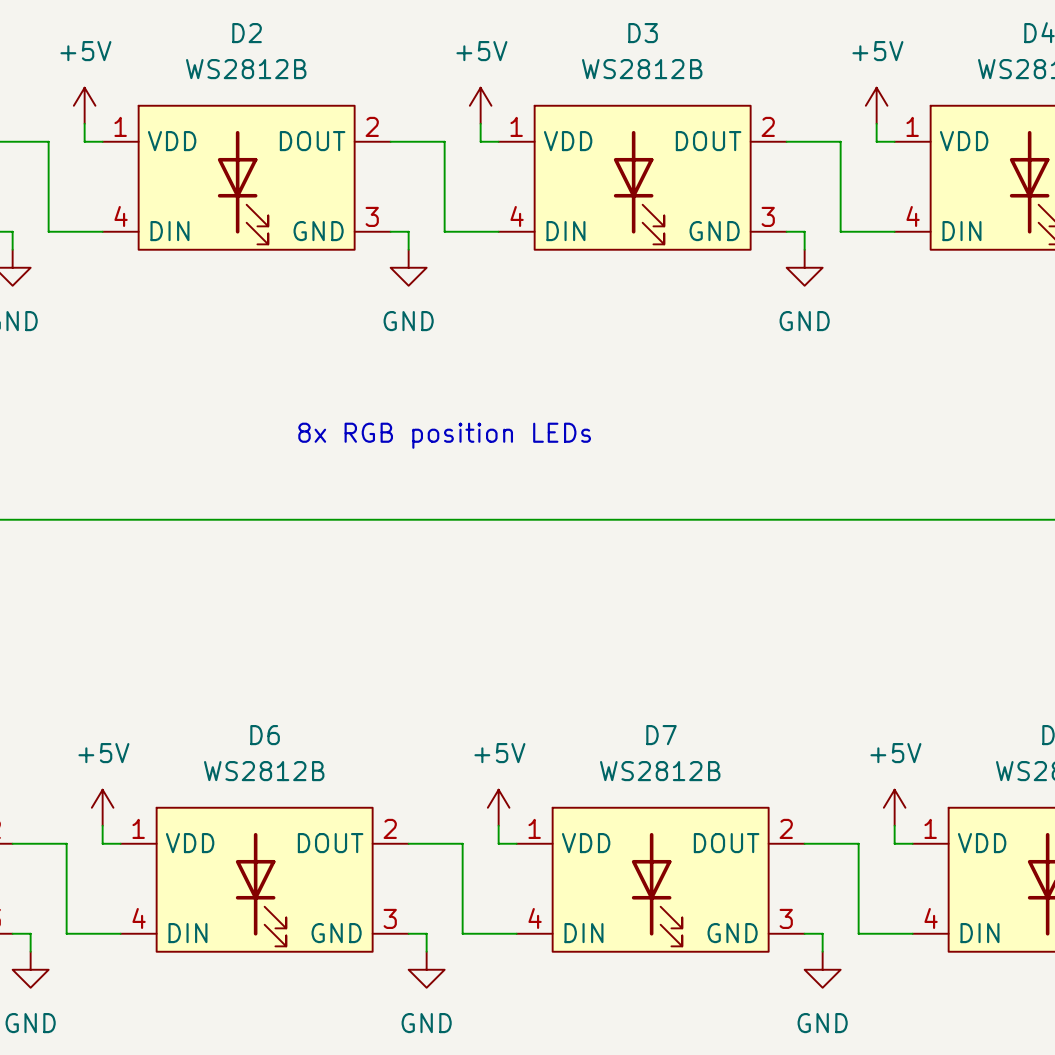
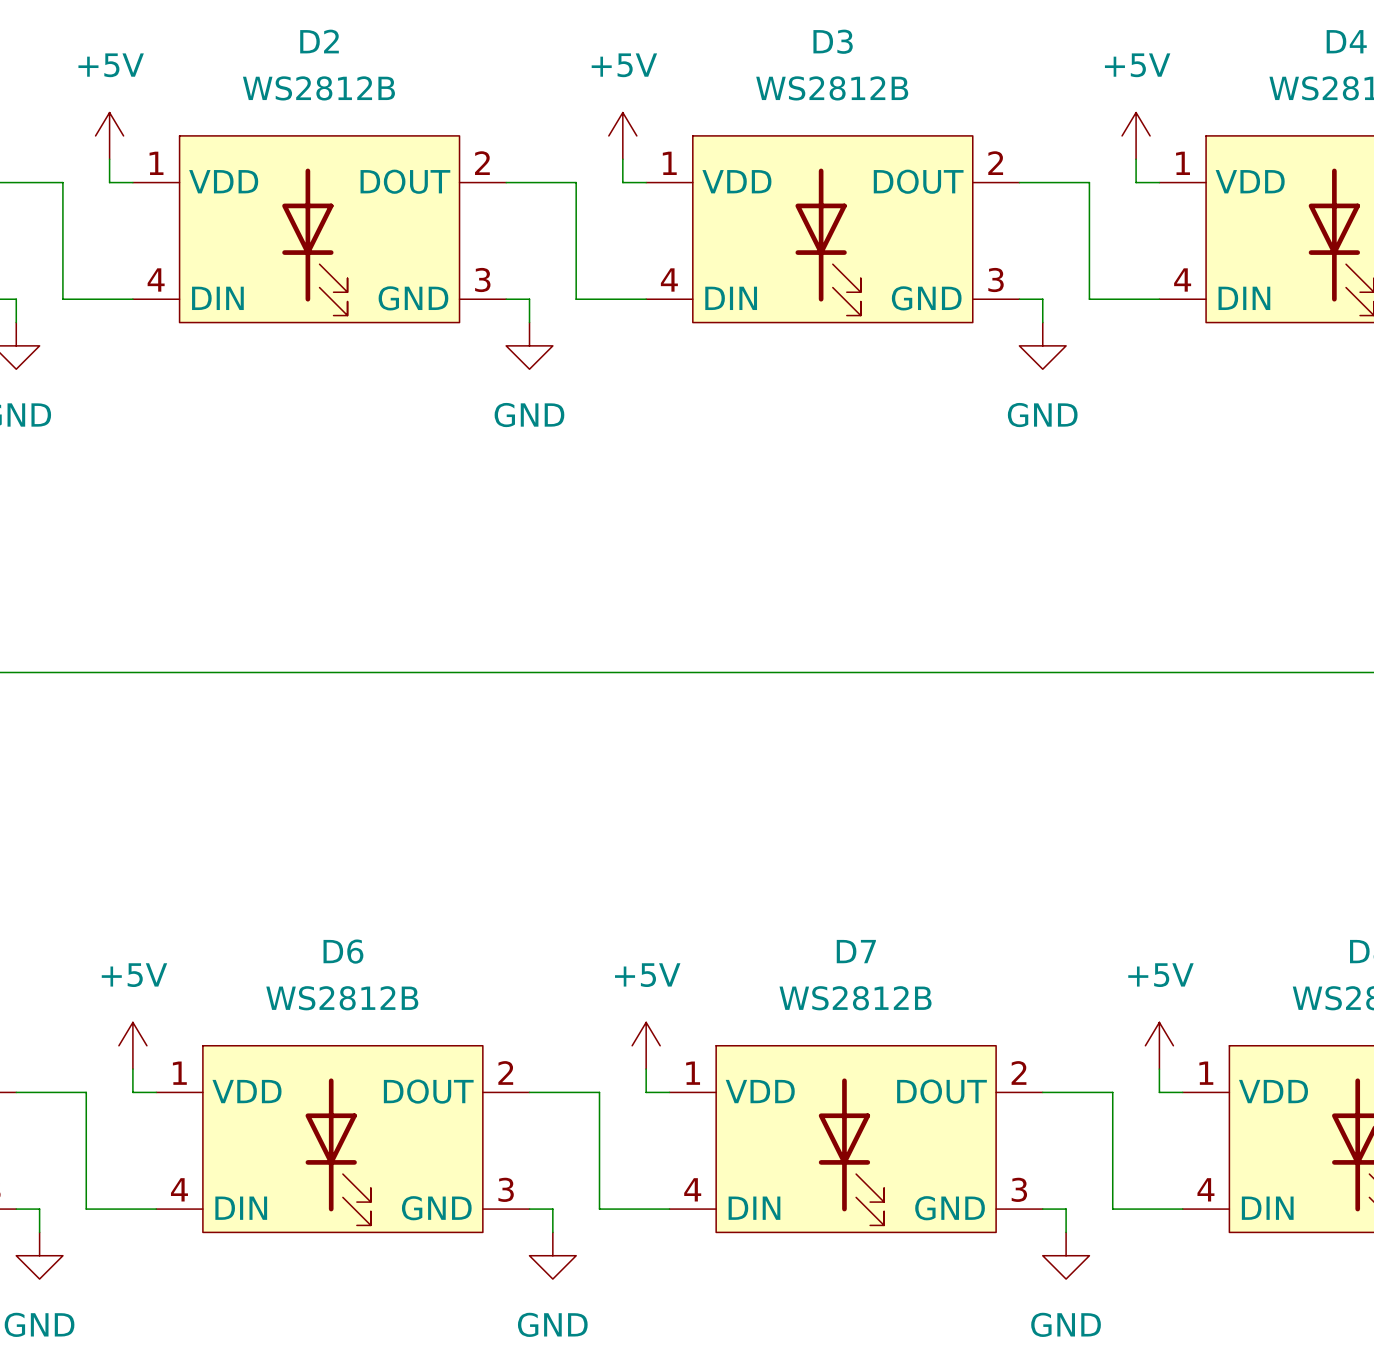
text: 8x RGB position LEDs (444, 435) -> none

